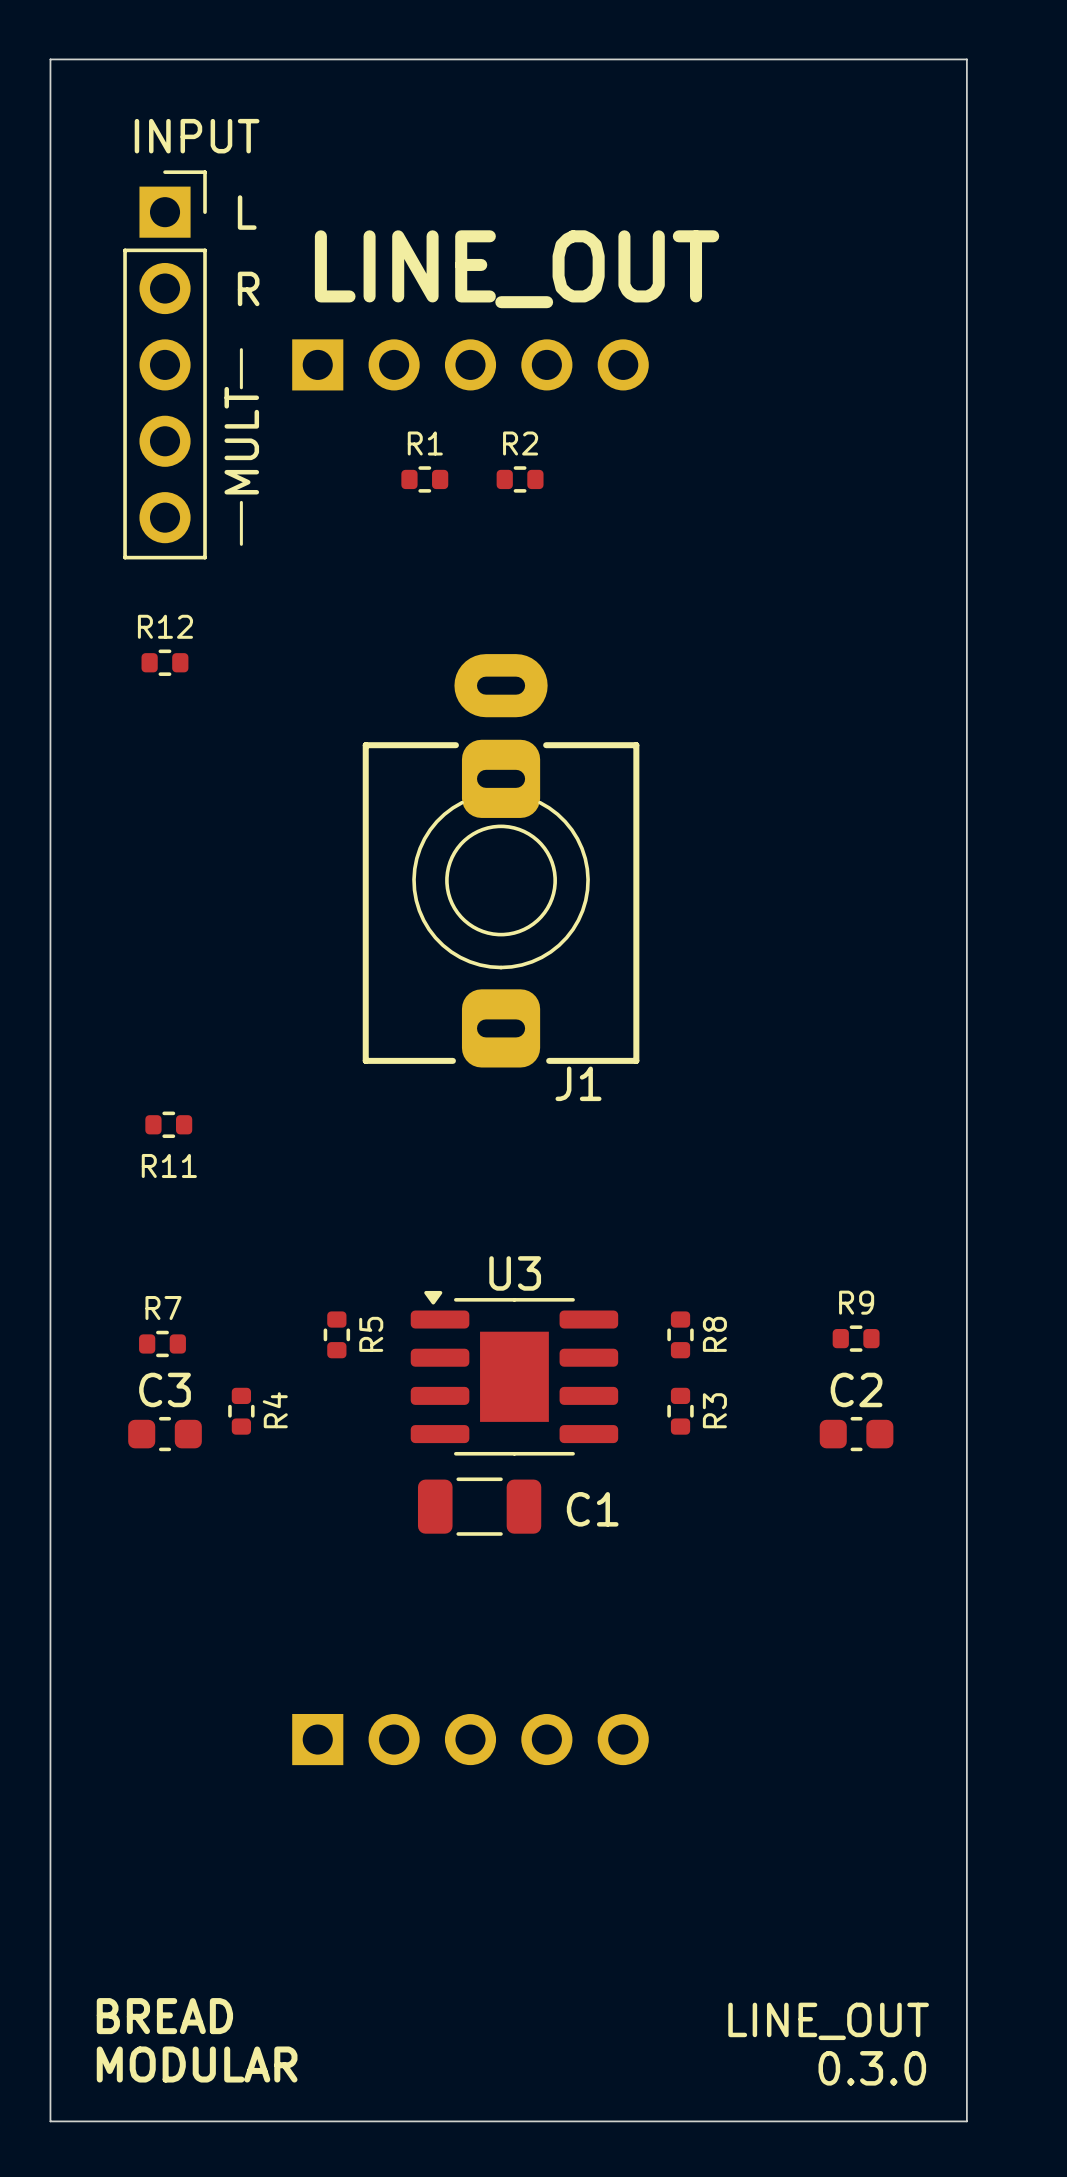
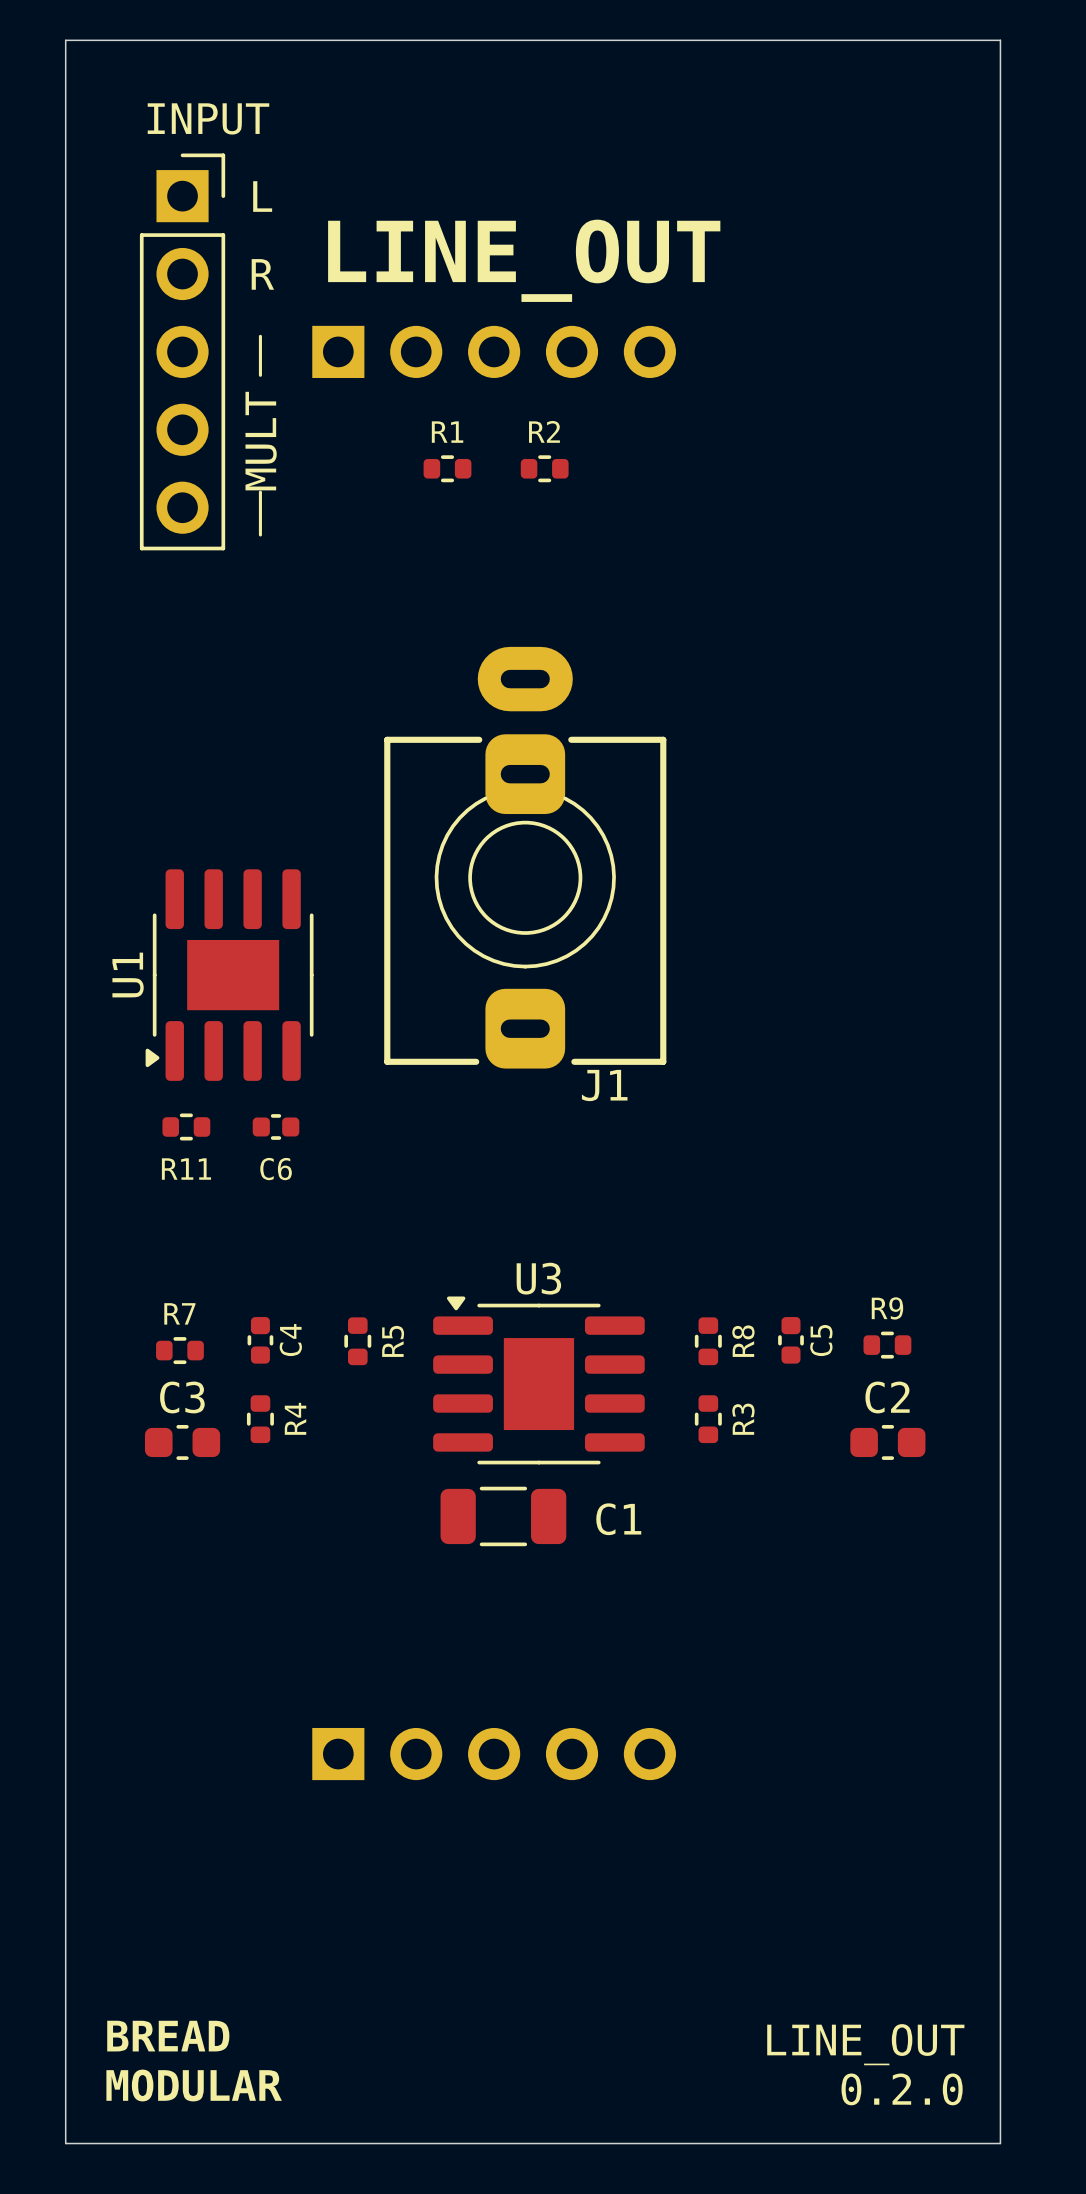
R12: (164, 662) -> none
U1: none -> (229, 975)
C6: none -> (276, 1126)
C4: none -> (260, 1340)
C5: none -> (790, 1340)
text: 0.3.0 (872, 2068) -> 0.2.0 (902, 2089)

